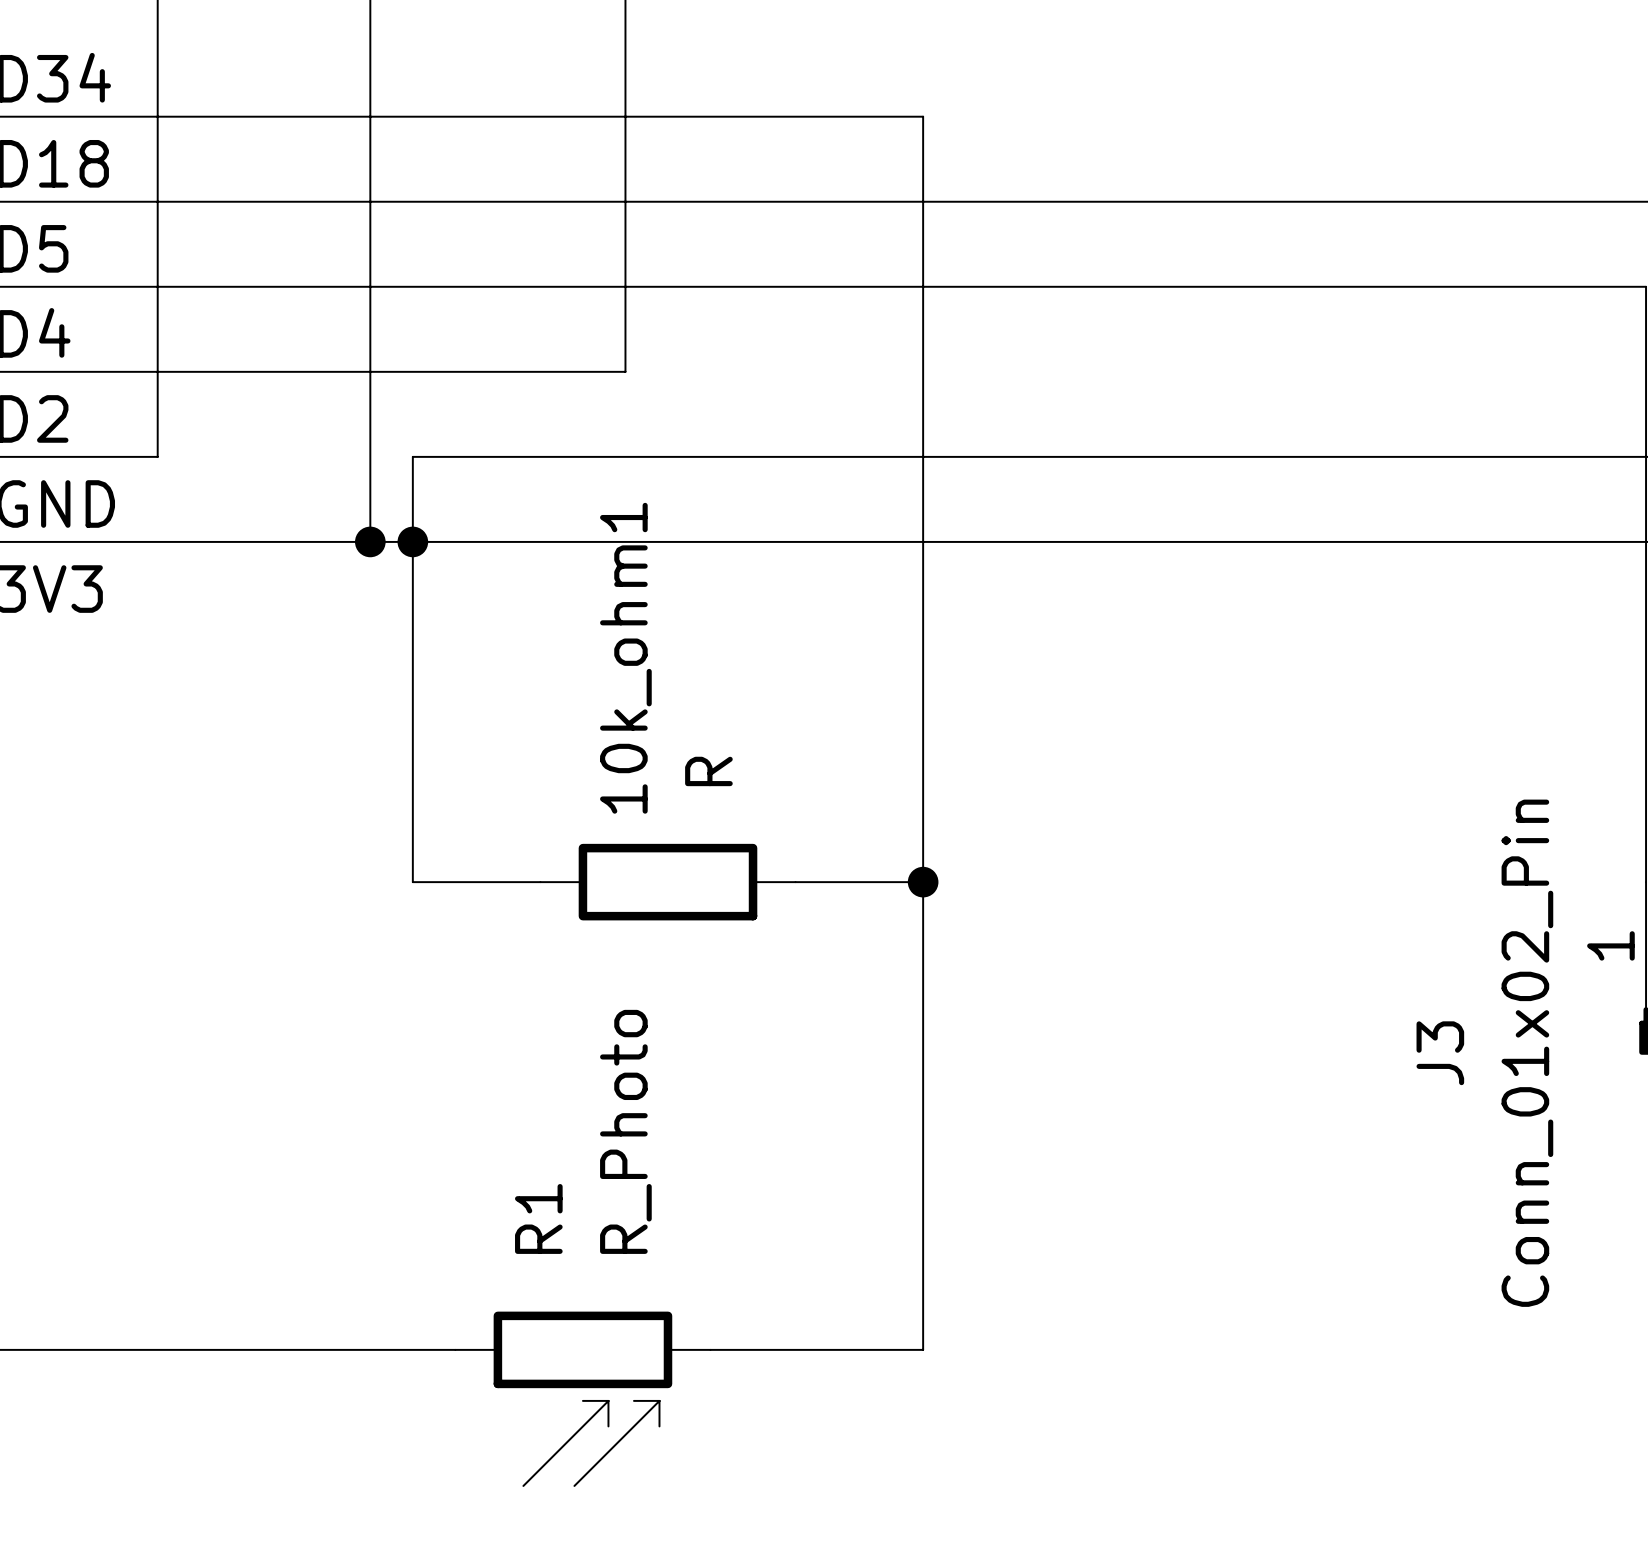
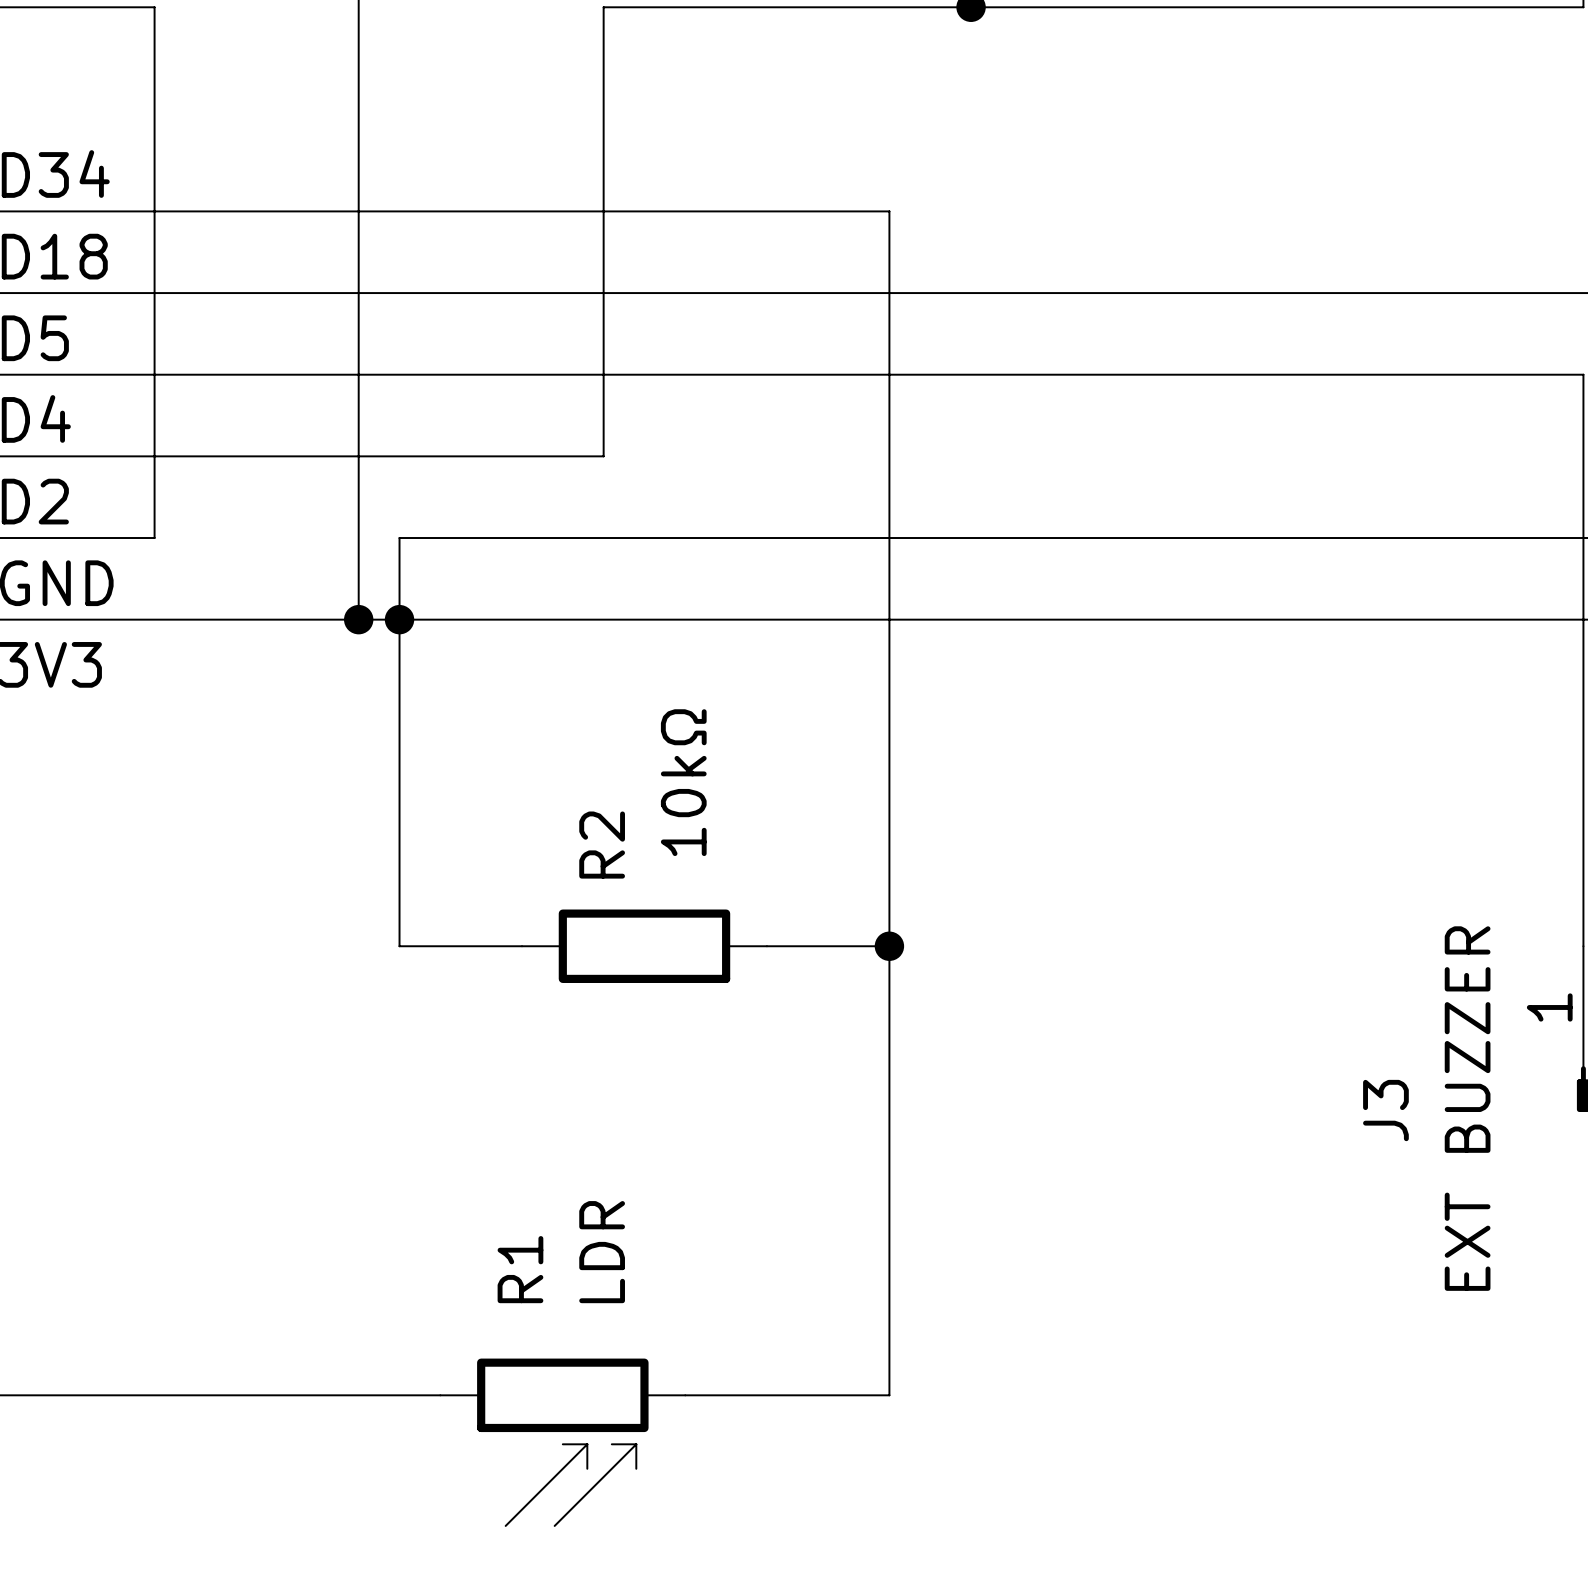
10k_ohm1 name: 10k_ohm1 (625, 658) -> R2 (602, 845)
10k_ohm1 value: R (708, 771) -> 10kΩ (683, 782)
J3 value: Conn_01x02_Pin (1527, 1053) -> EXT BUZZER (1467, 1108)
R1 value: R_Photo (625, 1131) -> LDR (602, 1252)

